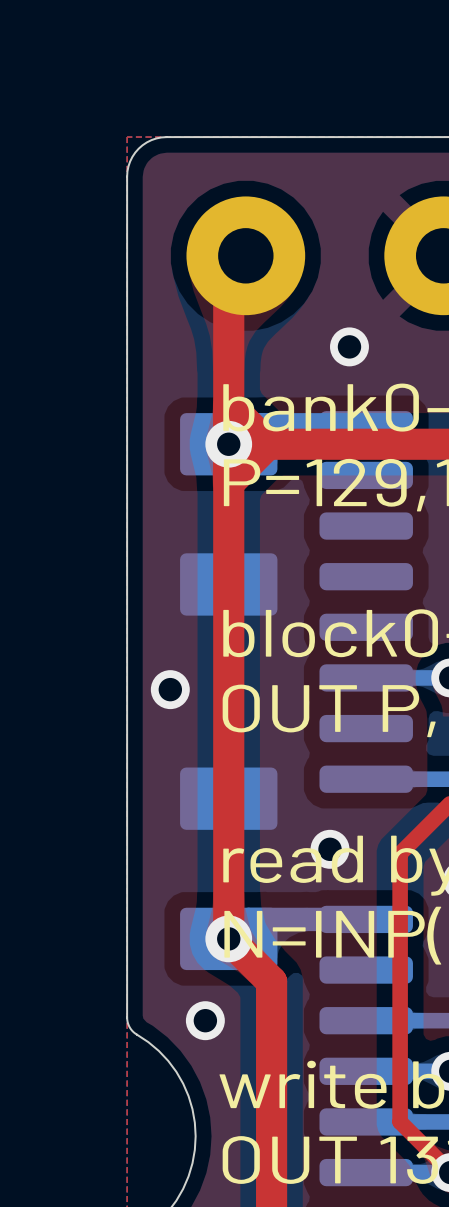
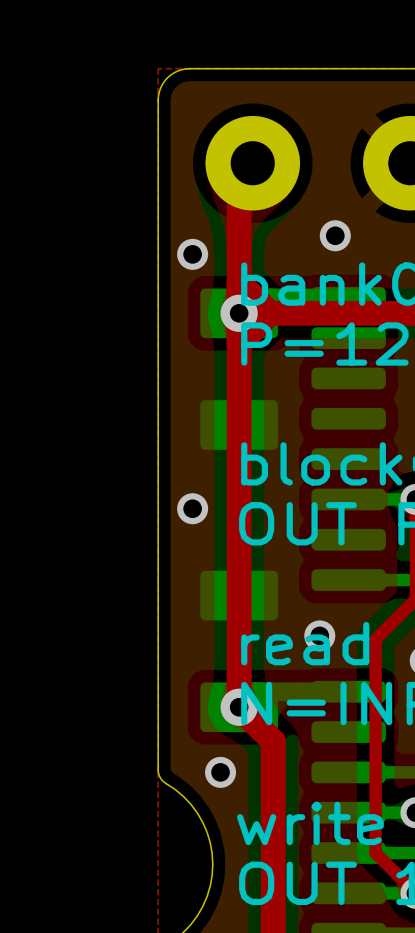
via: none -> (192, 254)

